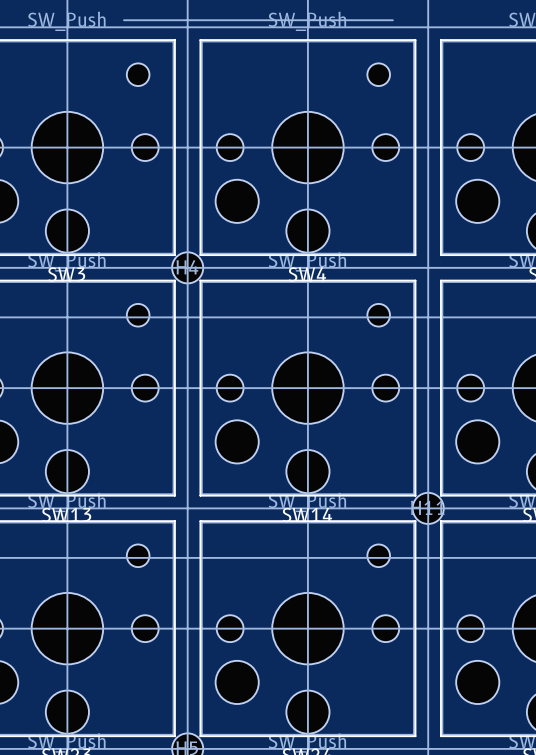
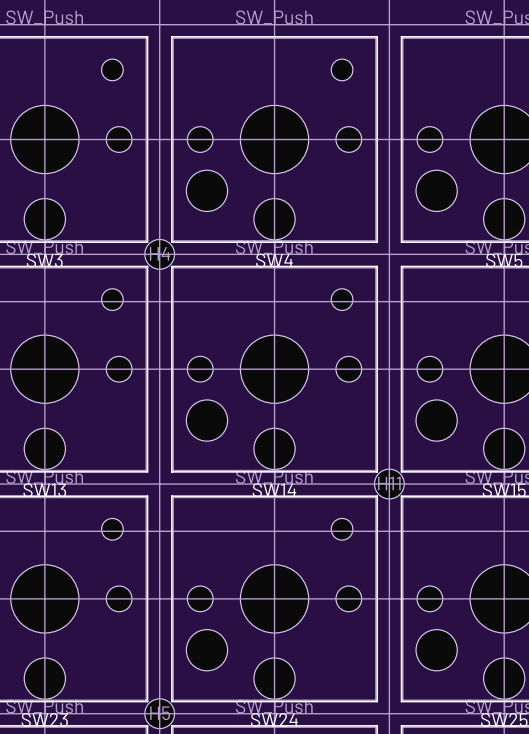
line: (124, 20) (392, 20) -> none

